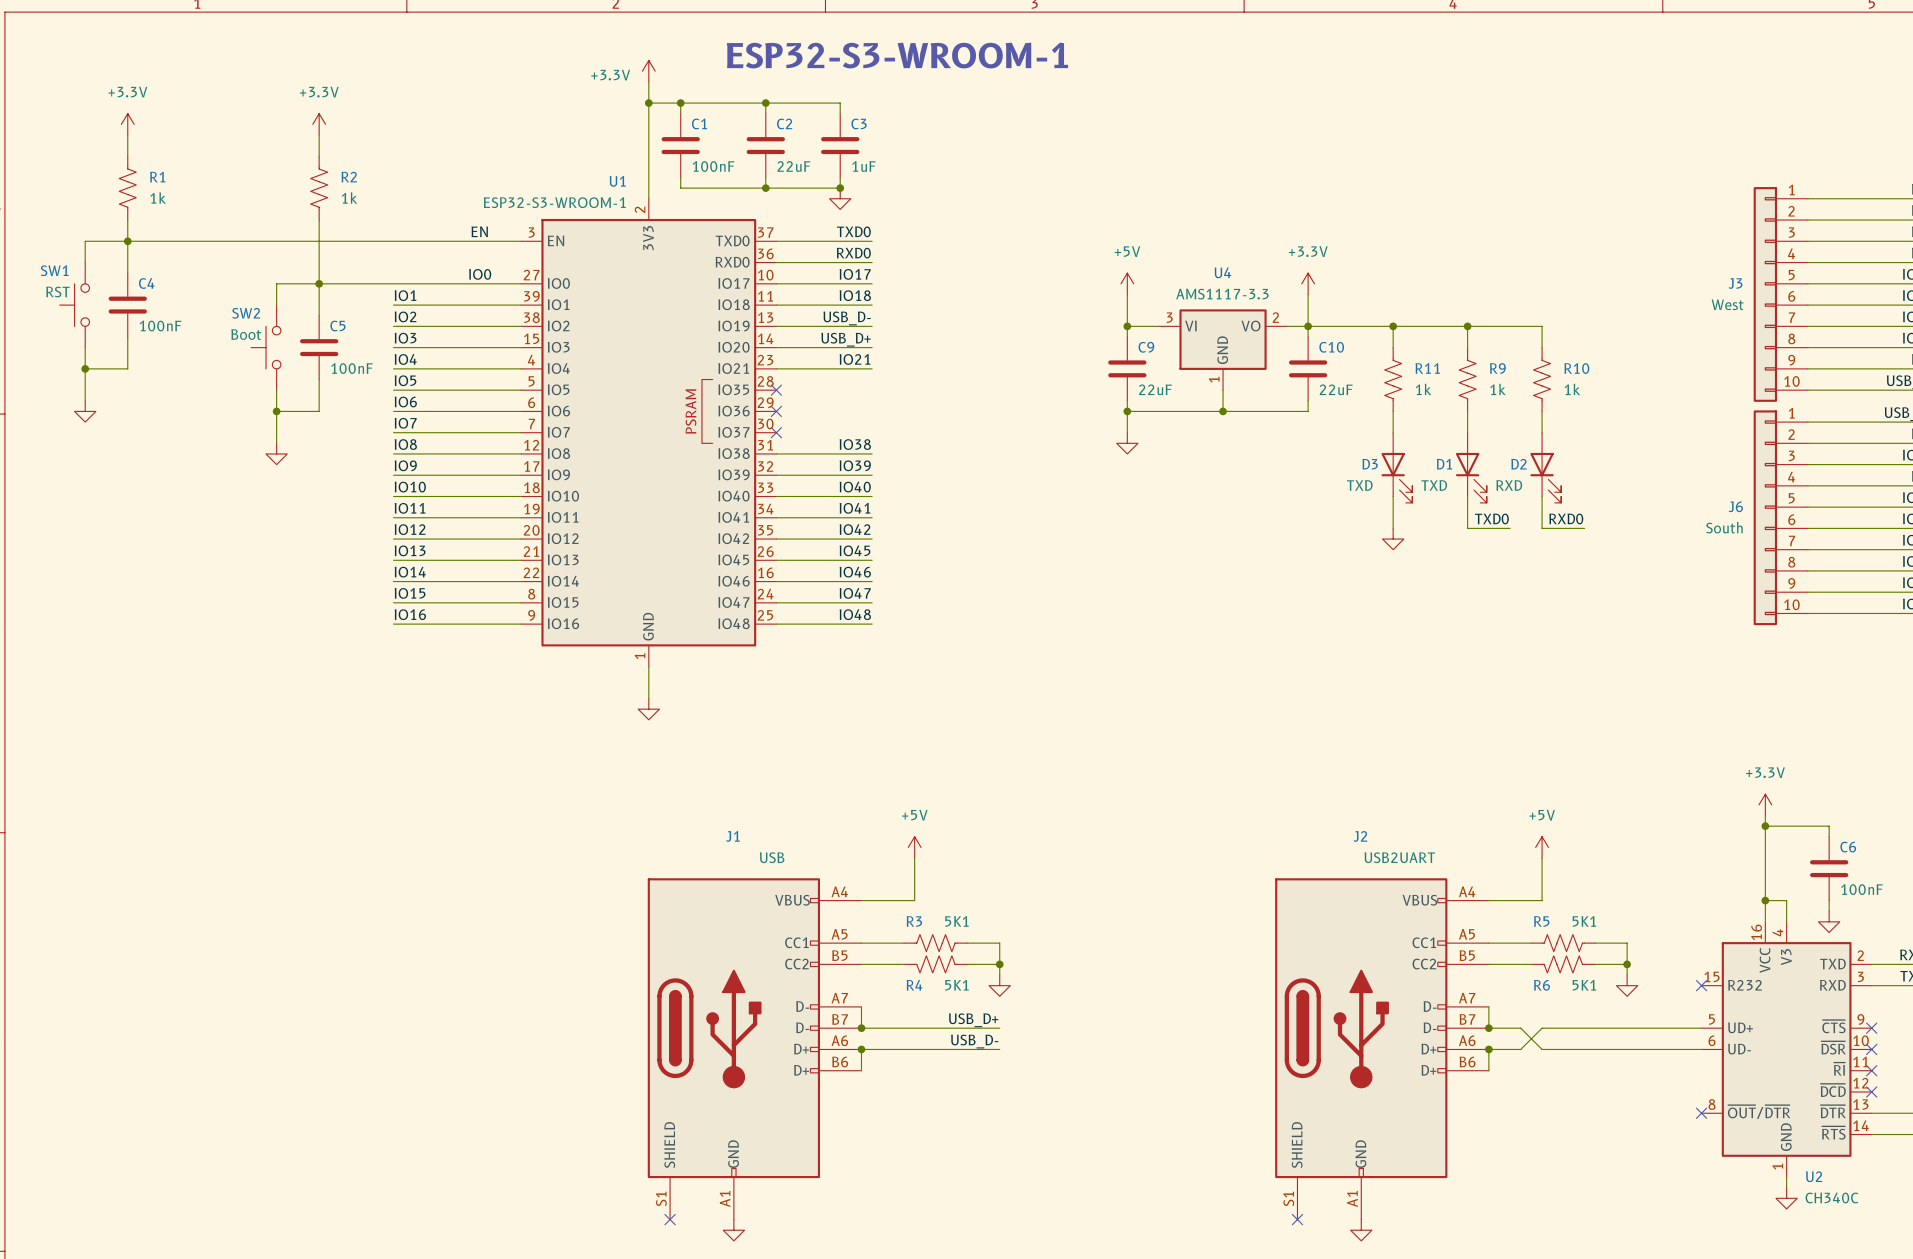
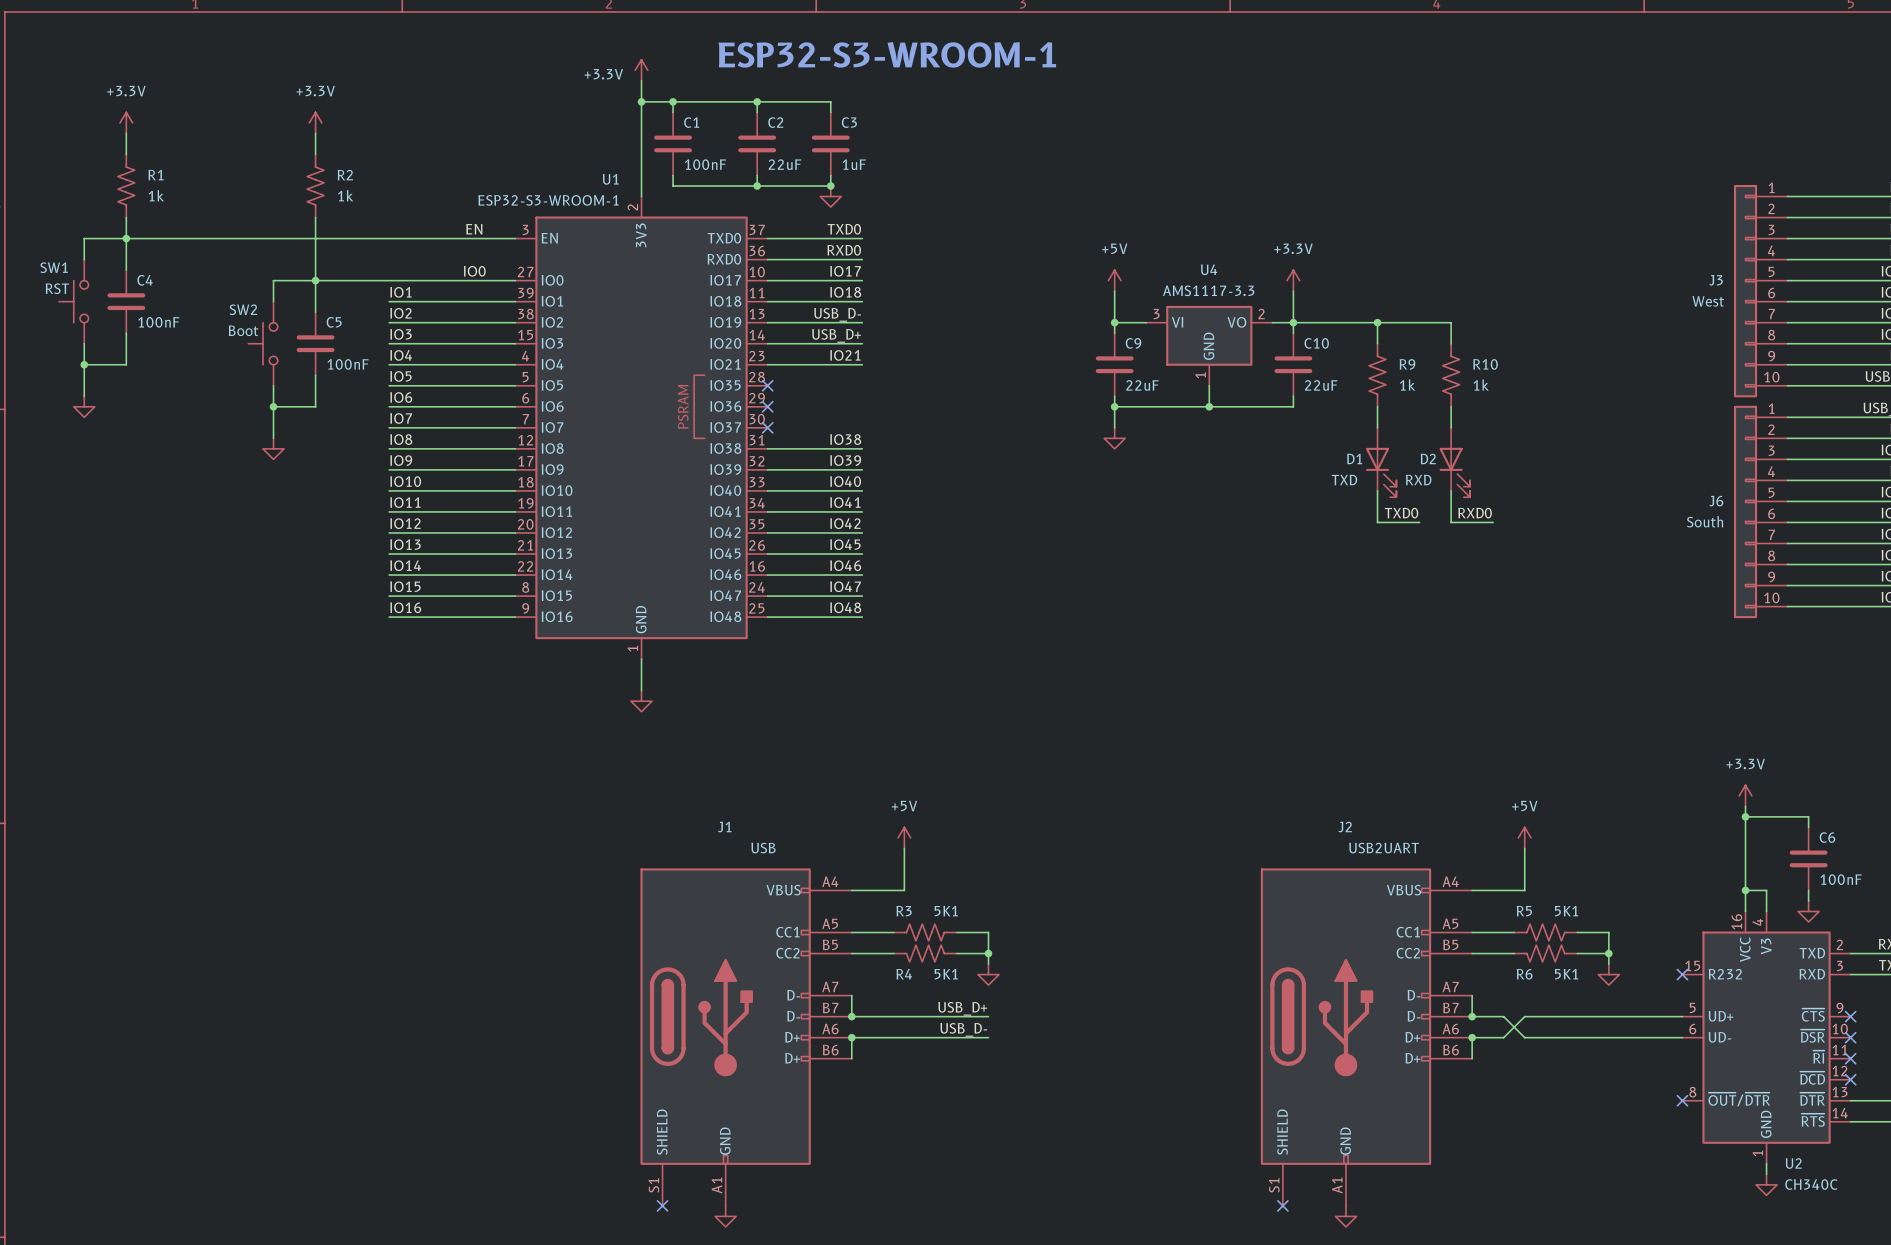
wire: (1467, 326) (1542, 326) (1542, 347) -> none
junction: (1467, 326) -> none
R11 name: R11 (1427, 368) -> R9 (1407, 364)
R9 name: R9 (1497, 368) -> R10 (1485, 364)
R10: 1k (1542, 379) -> none
wire: (1542, 411) (1542, 432) -> none
D3 name: D3 (1370, 464) -> D1 (1354, 458)
D1 name: D1 (1444, 464) -> D2 (1428, 458)
D2: RXD (1545, 467) -> none
D1 value: TXD (1434, 485) -> RXD (1418, 480)
wire: (1542, 496) (1542, 528) (1584, 528) -> none
label: none -> TXD0 (1401, 513)
label: TXD0 (1491, 518) -> RXD0 (1475, 513)
label: RXD0 (1566, 518) -> none
wire: none -> (1377, 522) (1419, 522)
power symbol: (1393, 539) -> none

